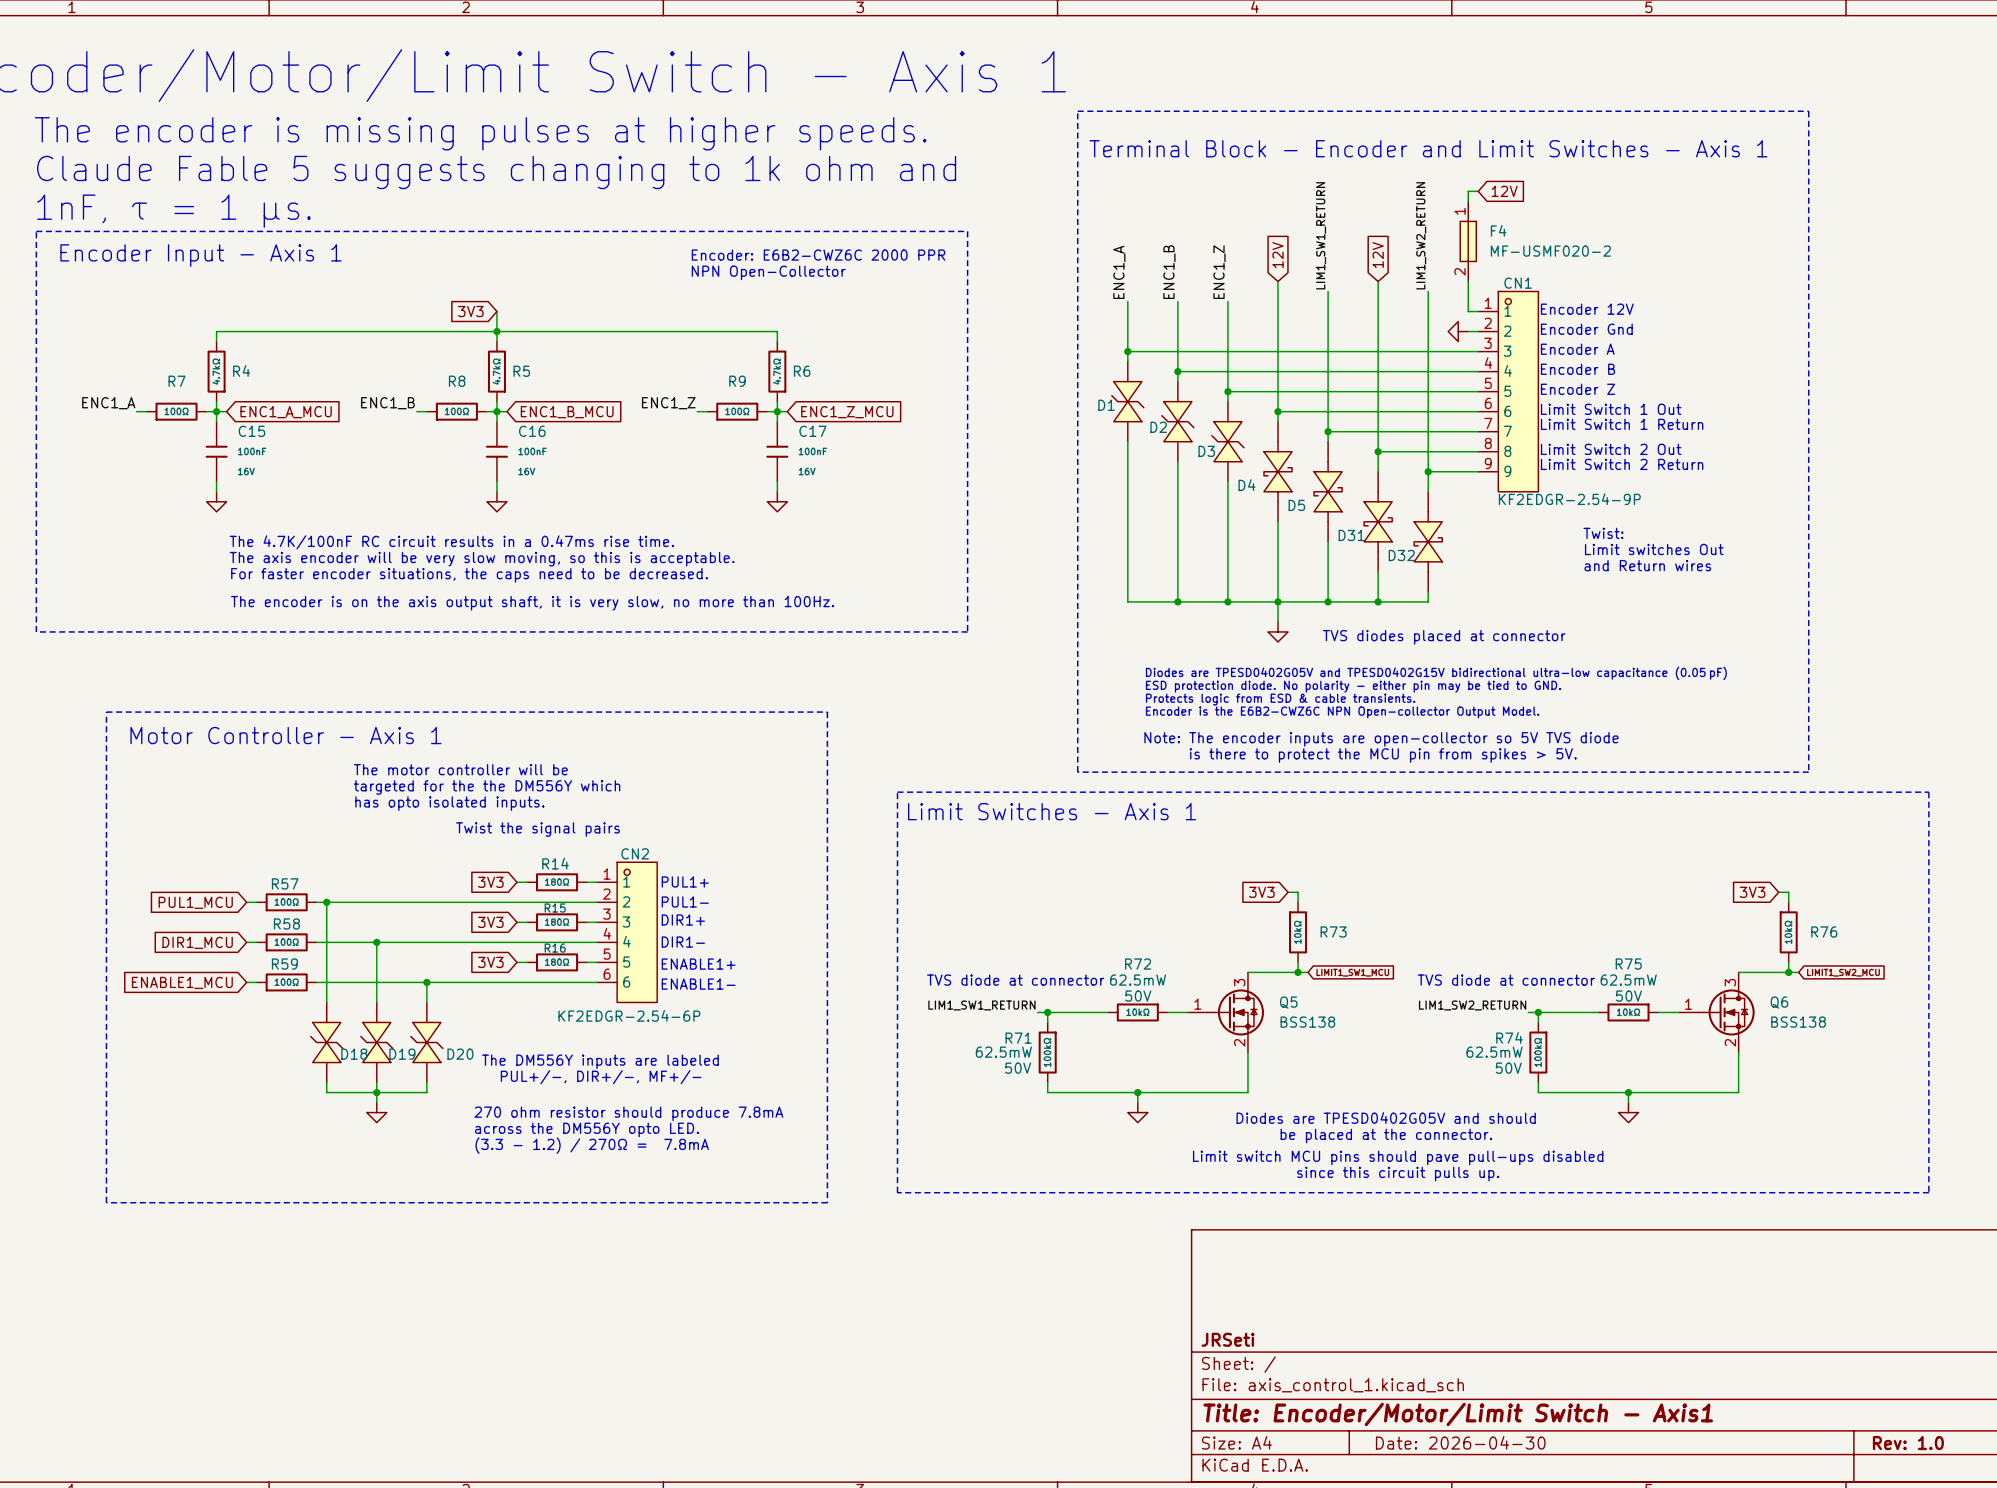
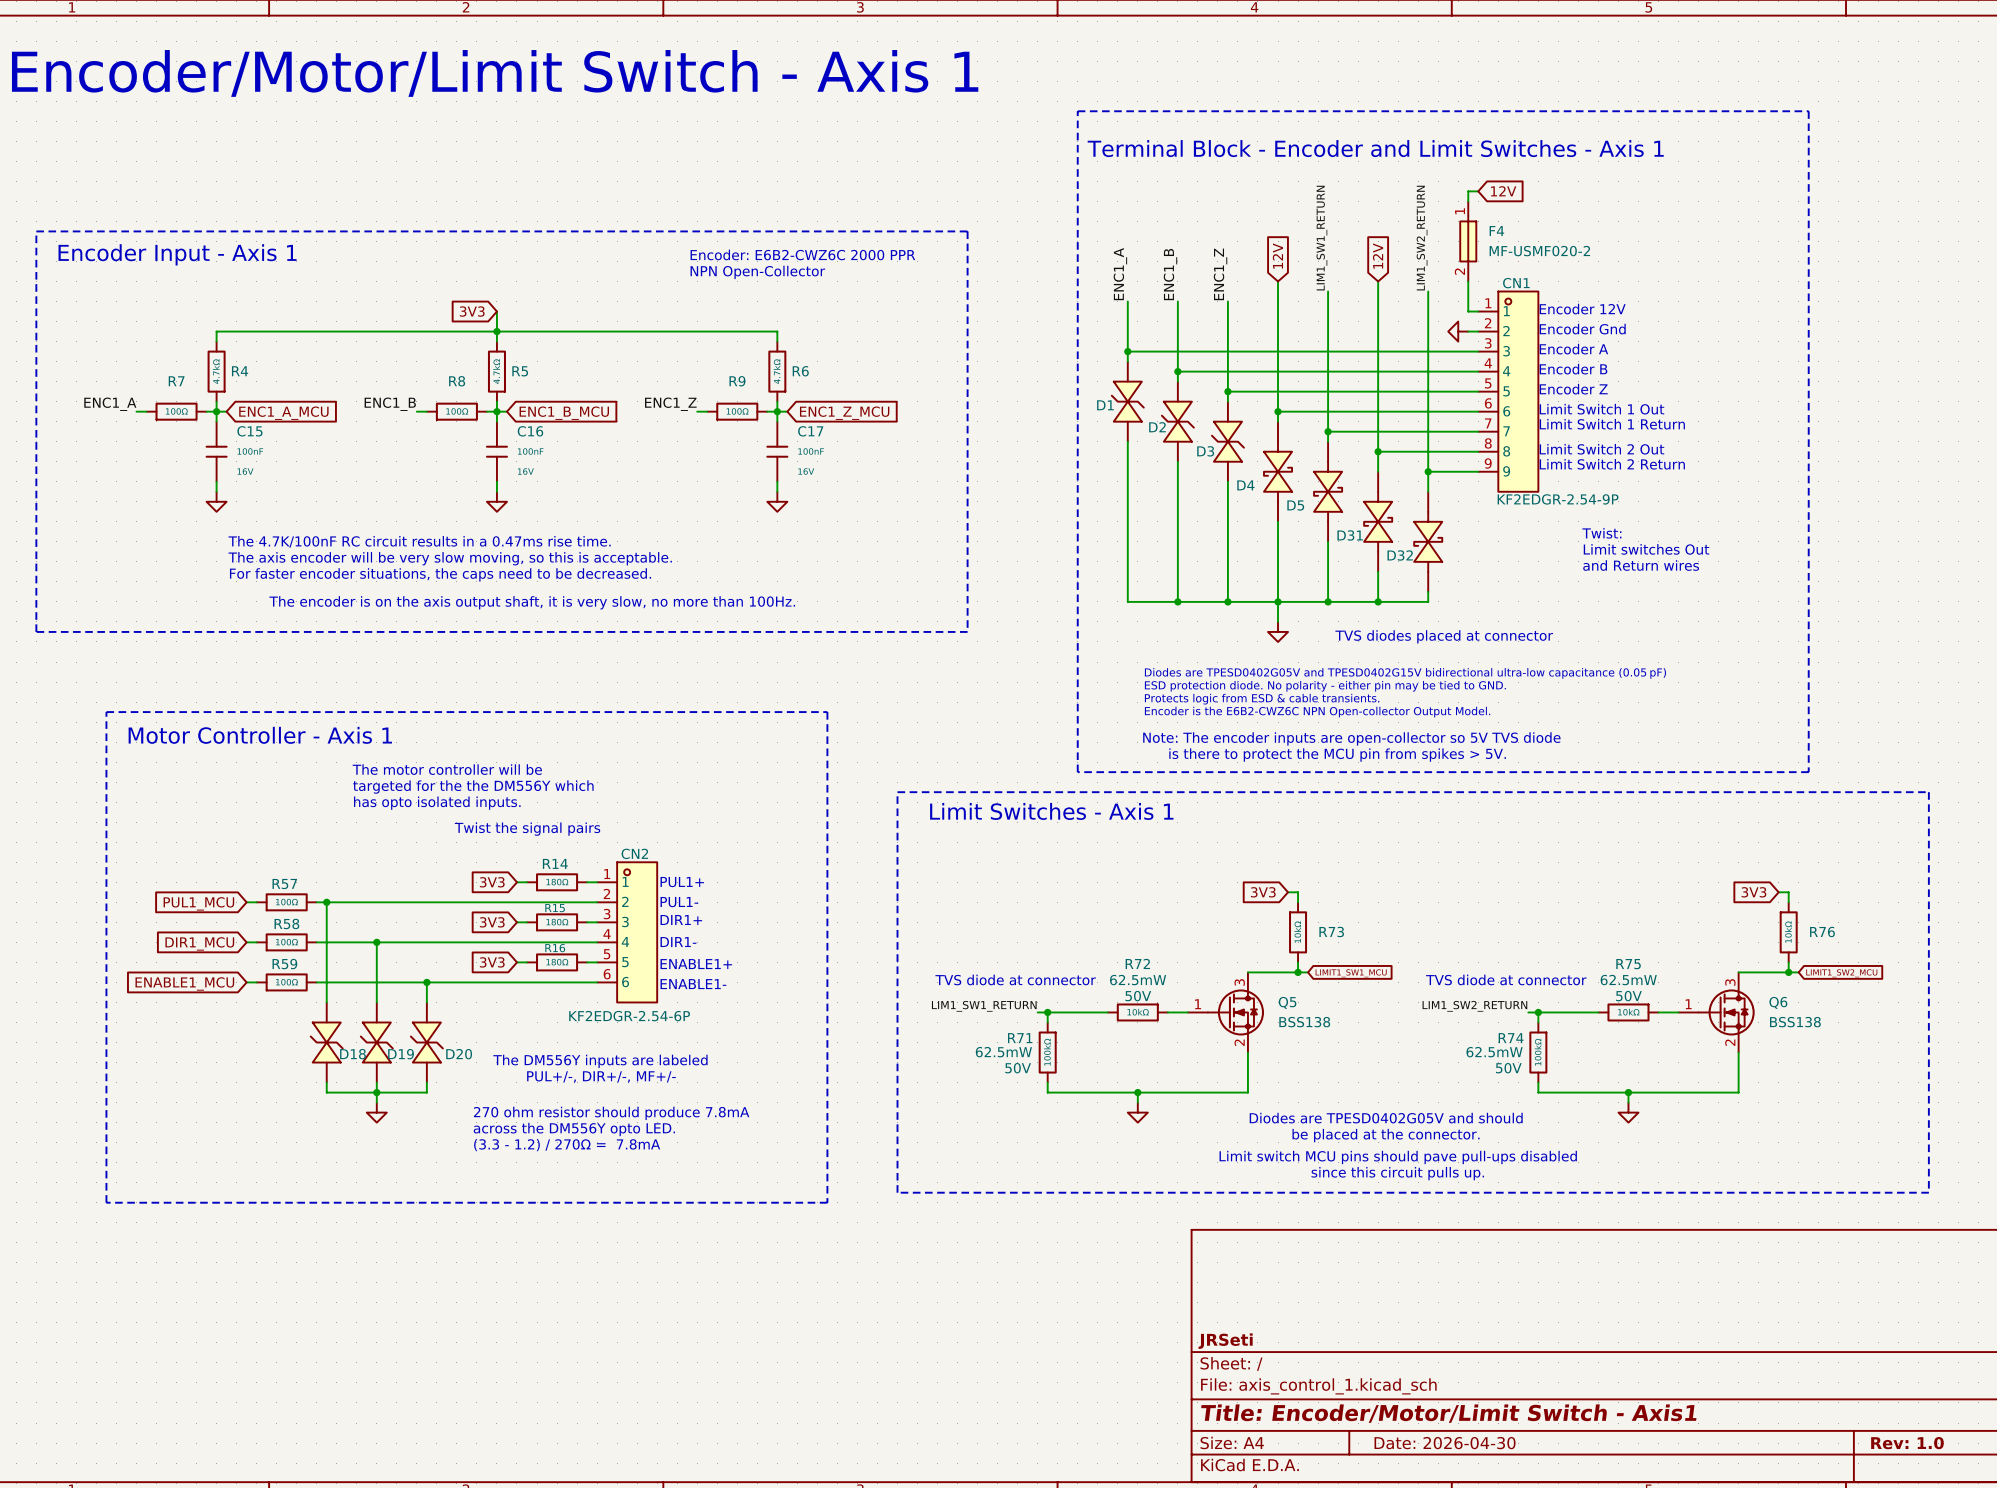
text: The encoder is missing pulses at higher speeds. (480, 133) -> none
text: Claude Fable 5 suggests changing to 1k ohm and (496, 172) -> none
text: 1nF, τ = 1 µs. (173, 211) -> none

